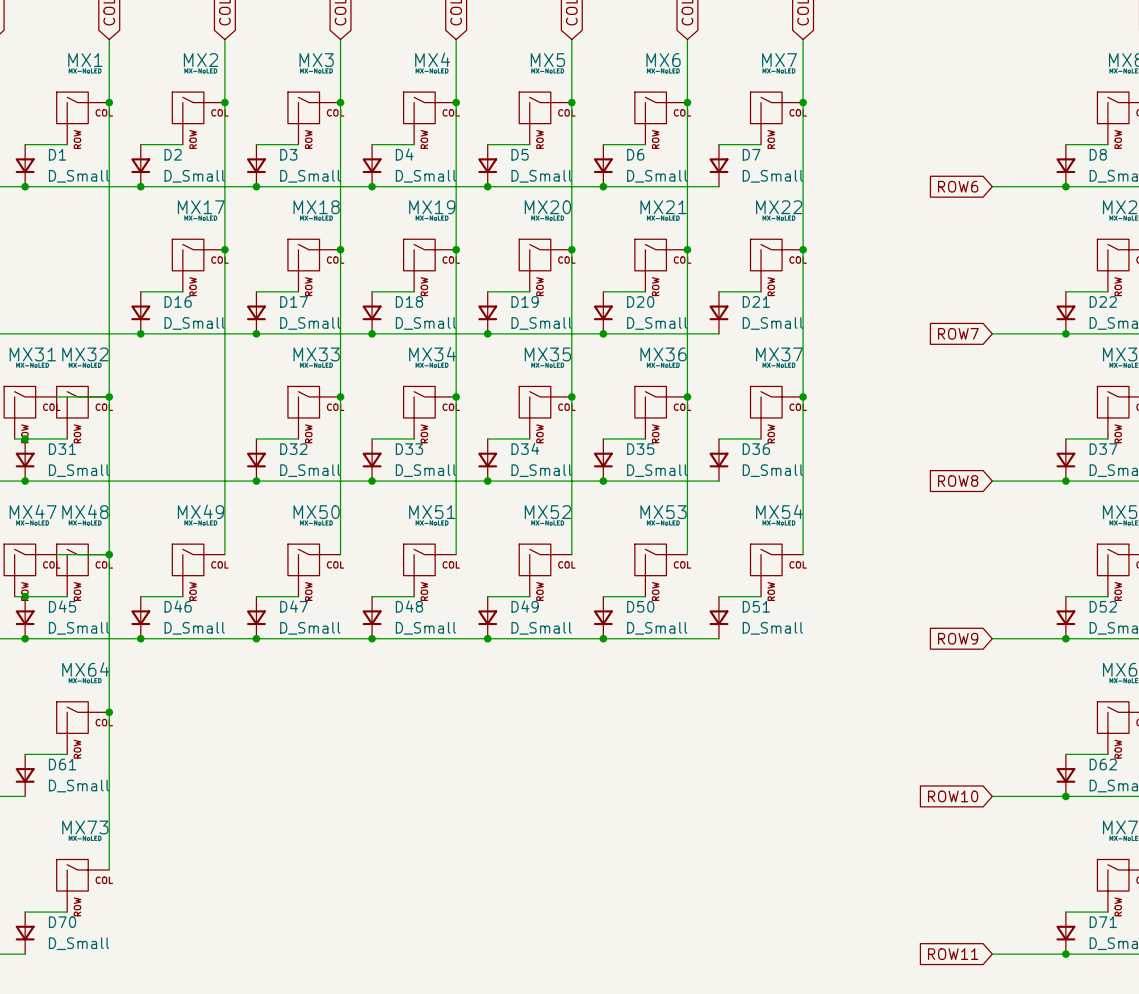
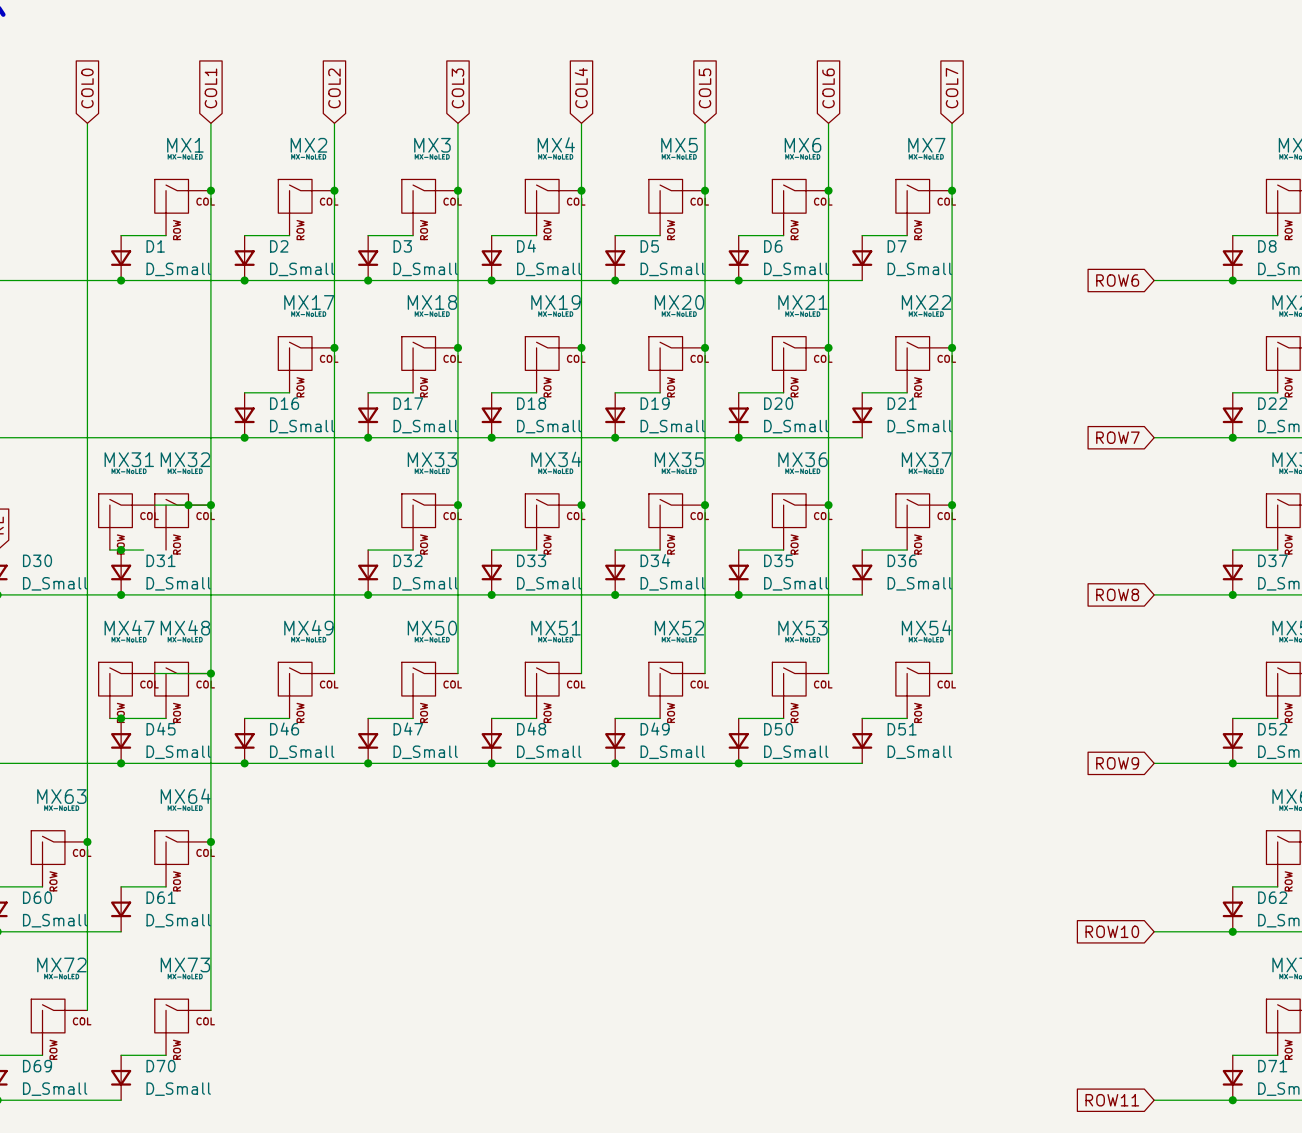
junction: none -> (188, 505)
wire: (46, 439) (67, 439) -> none

